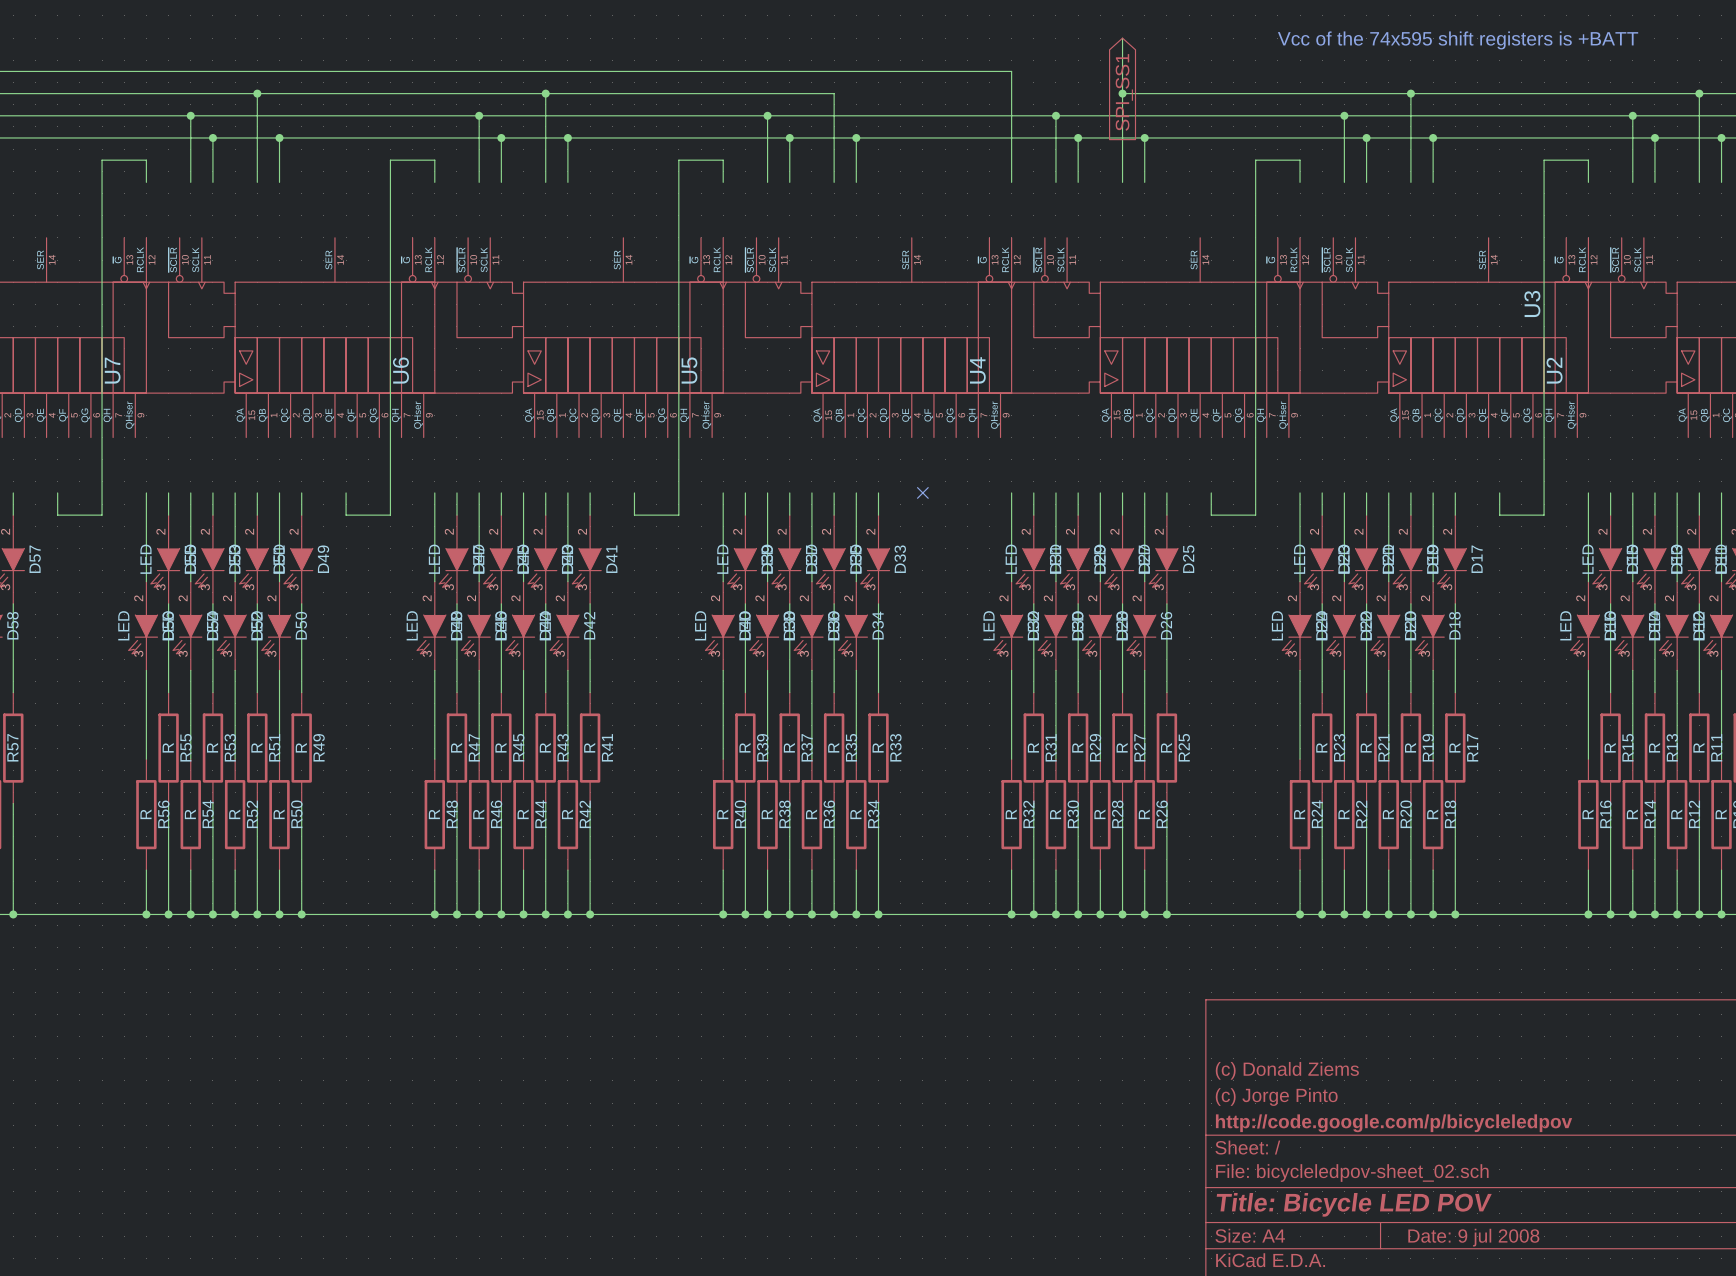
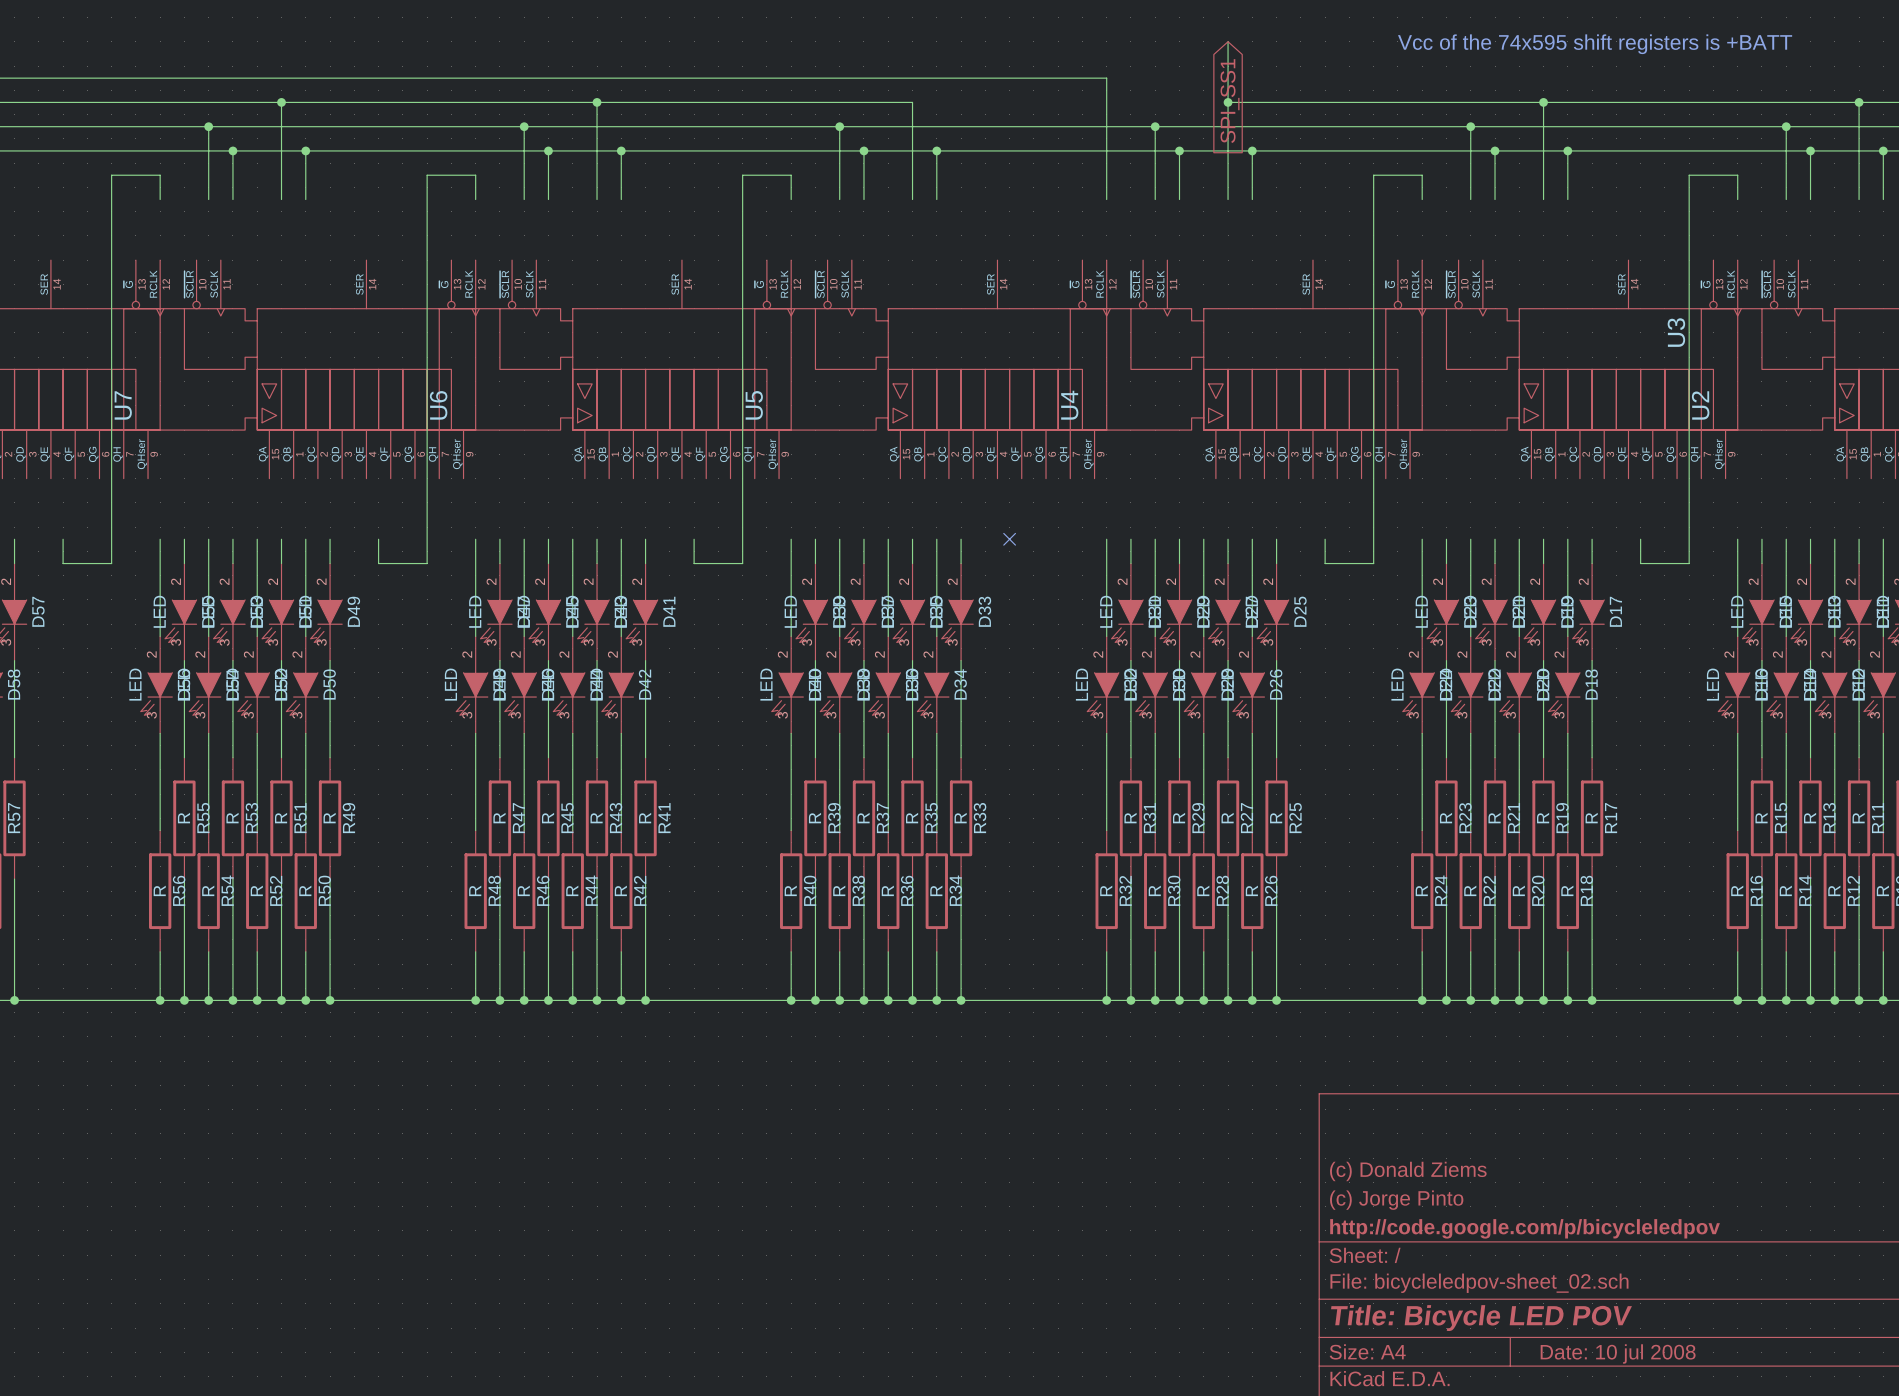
title block: Date: 9 jul 2008 (1473, 1237) -> Date: 10 jul 2008 (1618, 1353)

